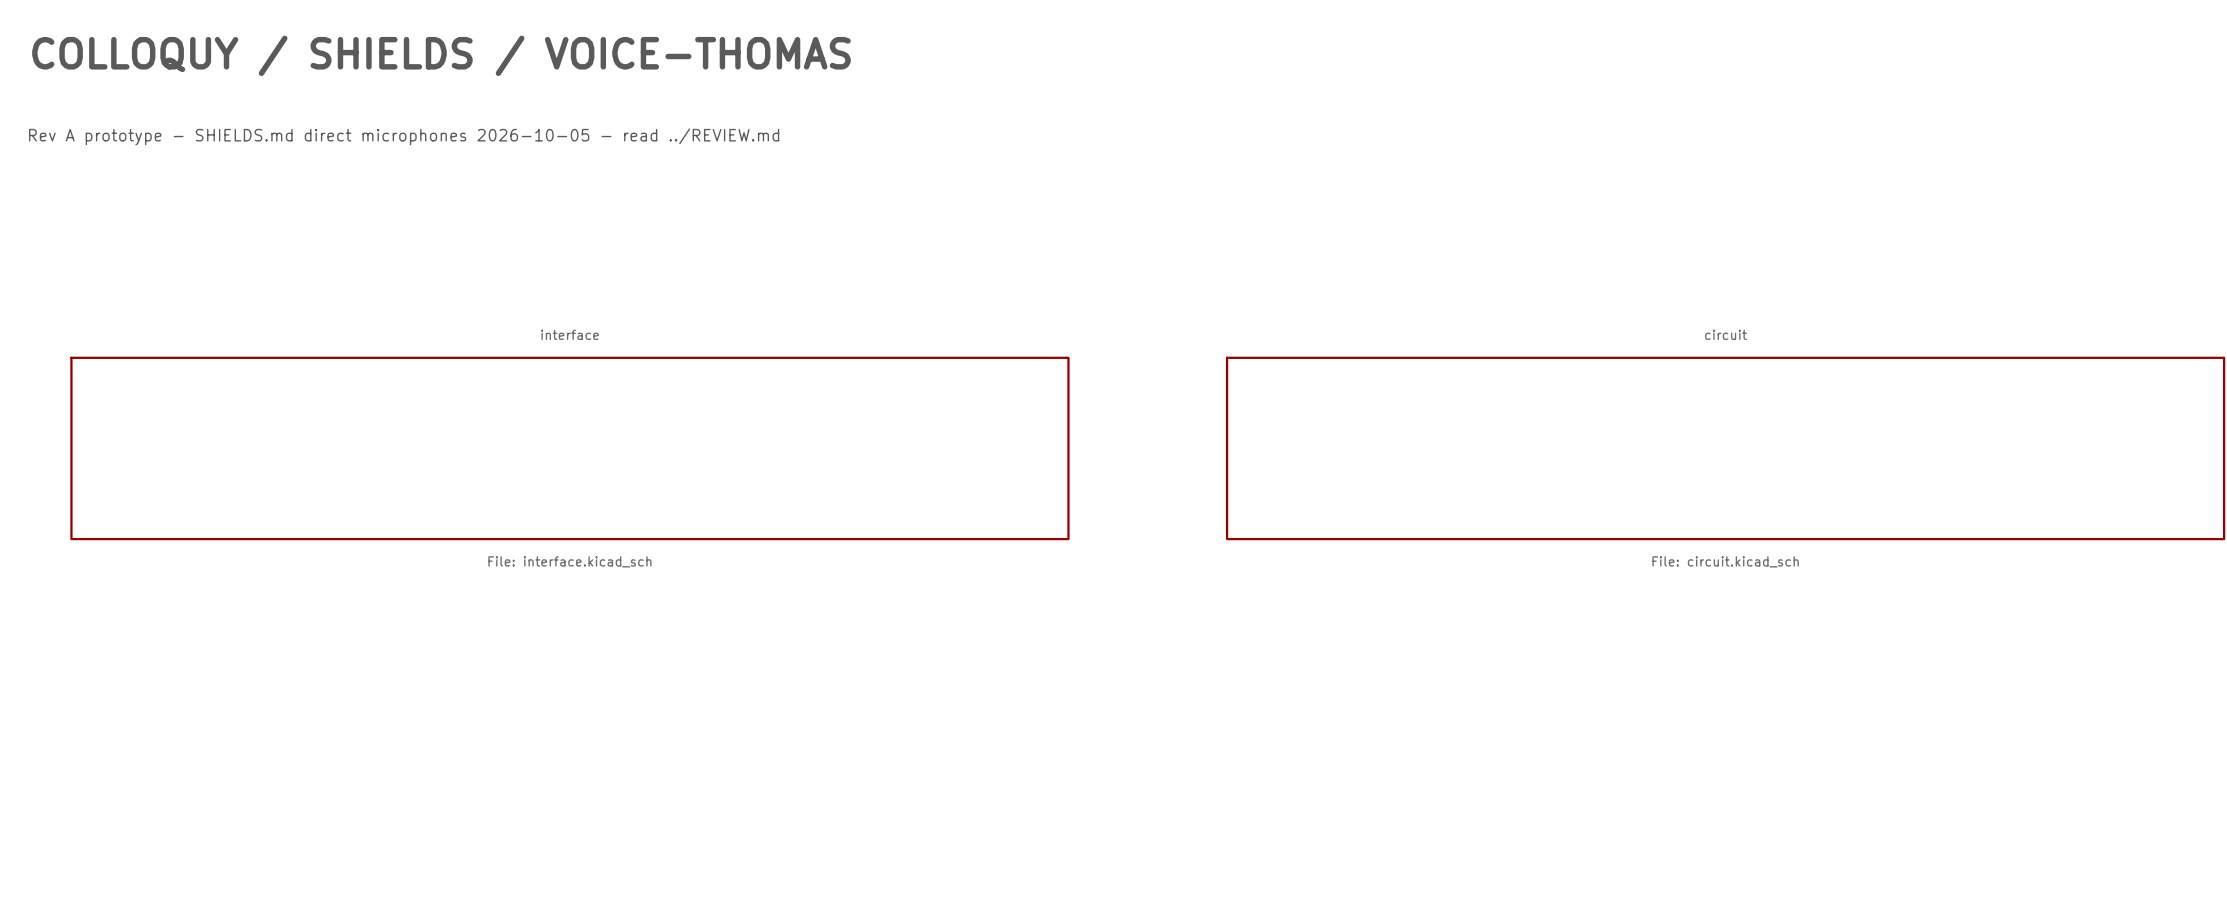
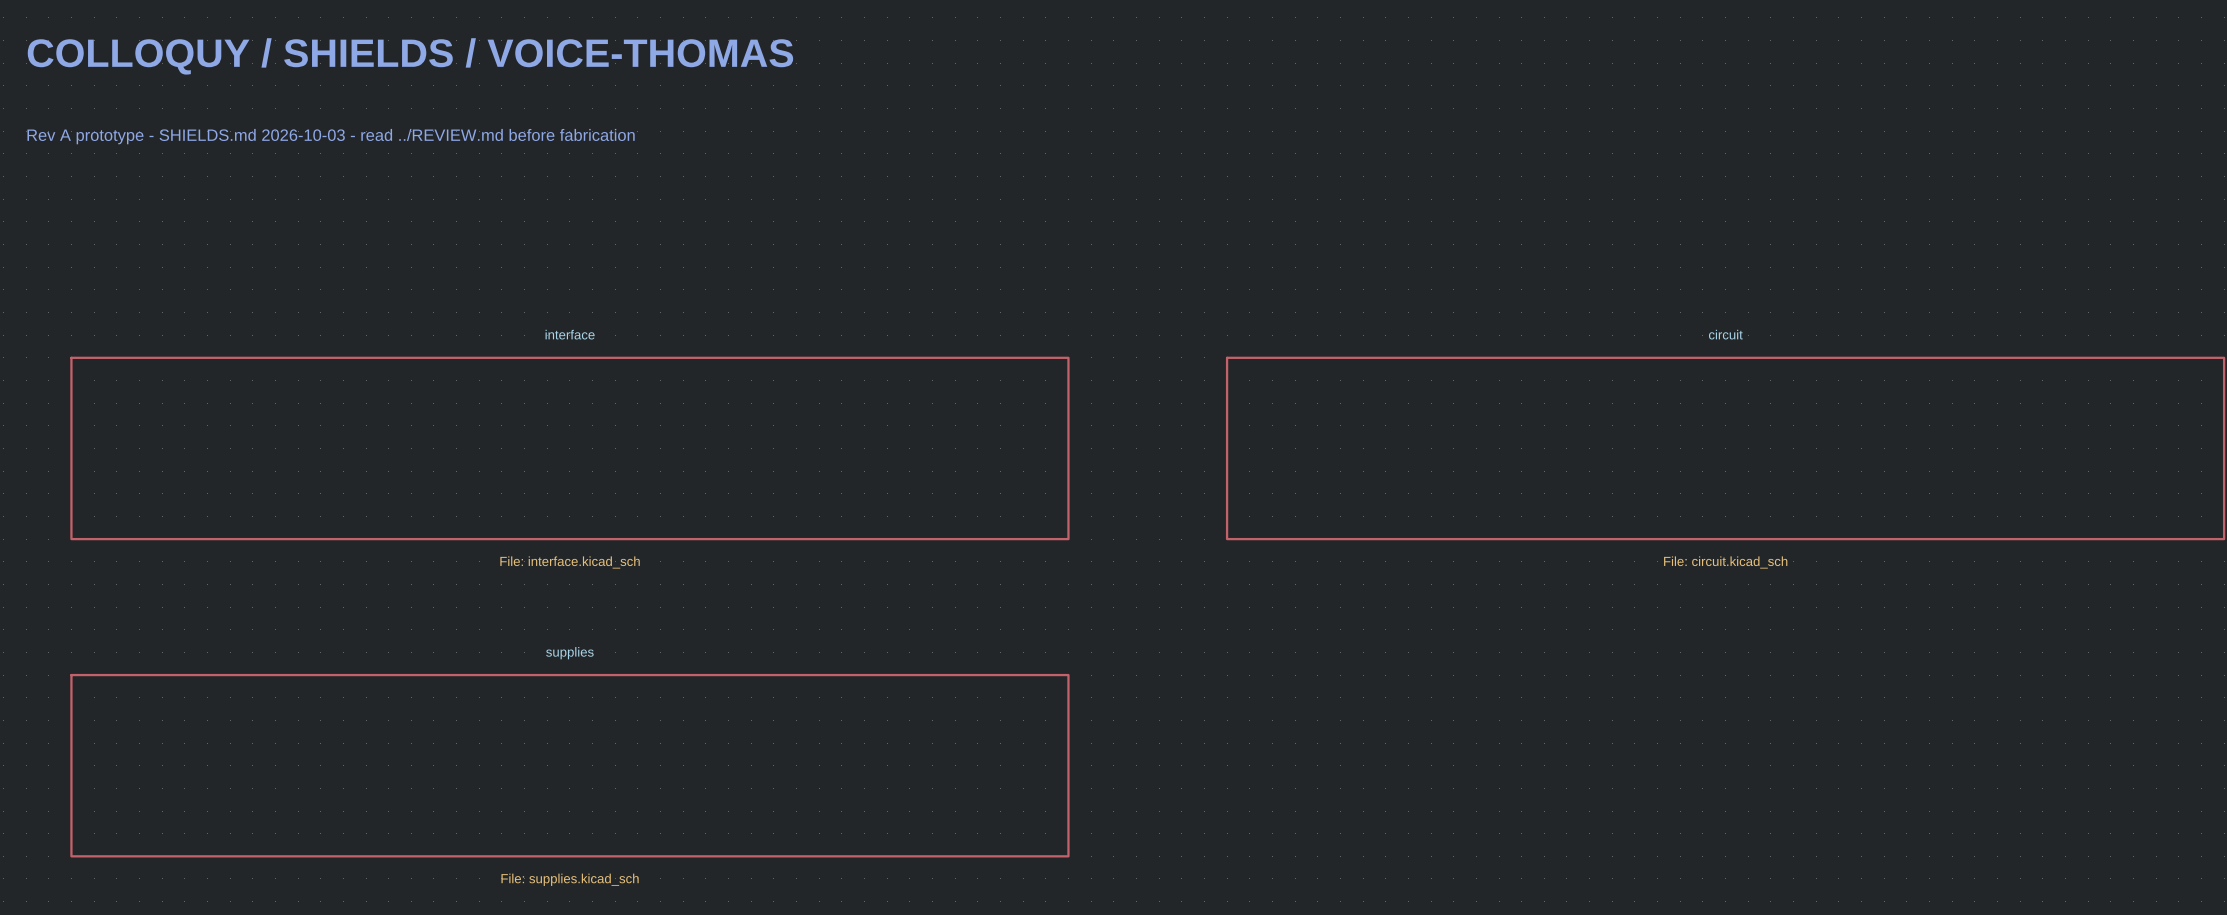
text: Rev A prototype - SHIELDS.md direct microphones 2026-10-05 - read ../REVIEW.md (404, 136) -> Rev A prototype - SHIELDS.md 2026-10-03 - read ../REVIEW.md before fabrication (331, 136)
sheet supplies: none -> File: supplies.kicad_sch (569, 765)

